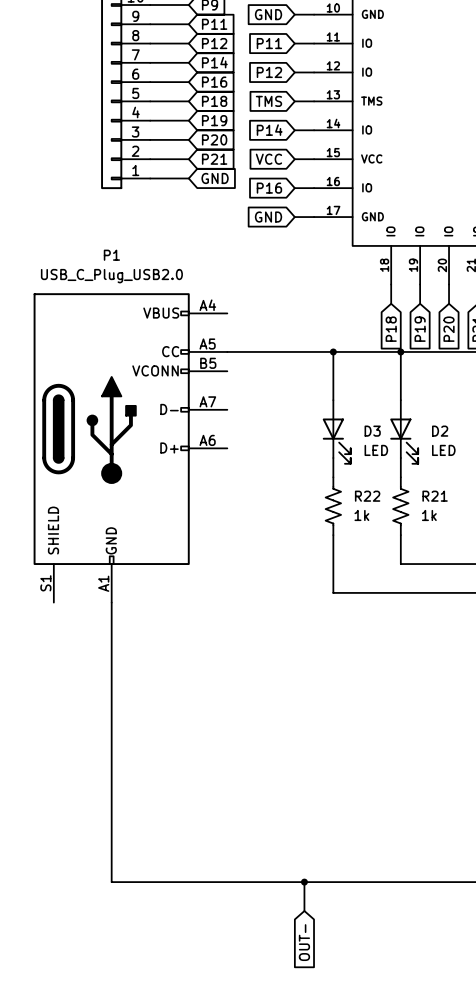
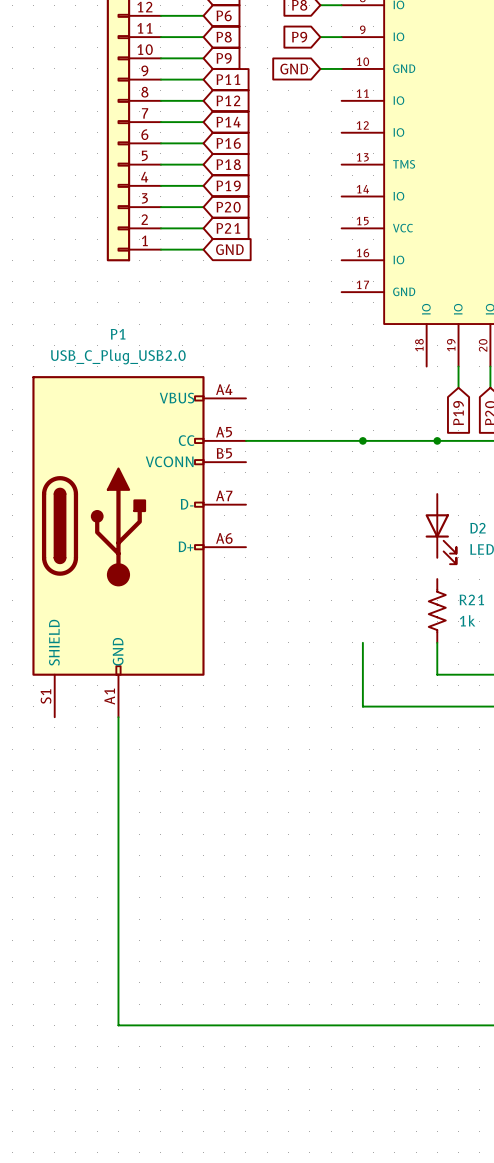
global label: P11 (269, 43) -> none
wire: (294, 43) (314, 43) -> none
global label: P12 (269, 72) -> none
wire: (294, 72) (314, 72) -> none
global label: TMS (268, 101) -> none
wire: (294, 101) (314, 101) -> none
global label: P14 (269, 130) -> none
wire: (294, 130) (314, 130) -> none
global label: VCC (268, 159) -> none
wire: (294, 159) (314, 159) -> none
global label: P16 (269, 188) -> none
wire: (294, 188) (314, 188) -> none
global label: GND (268, 217) -> none
wire: (294, 217) (314, 217) -> none
wire: (391, 284) (391, 303) -> none
global label: P18 (391, 329) -> none
wire: (333, 351) (333, 400) -> none
wire: (400, 351) (400, 400) -> none
D3: LED (336, 431) -> none
wire: (333, 458) (333, 477) -> none
wire: (400, 458) (400, 477) -> none
R22: 1k (333, 506) -> none
wire: (304, 882) (304, 911) -> none
junction: (304, 882) -> none
global label: OUT- (304, 942) -> none

